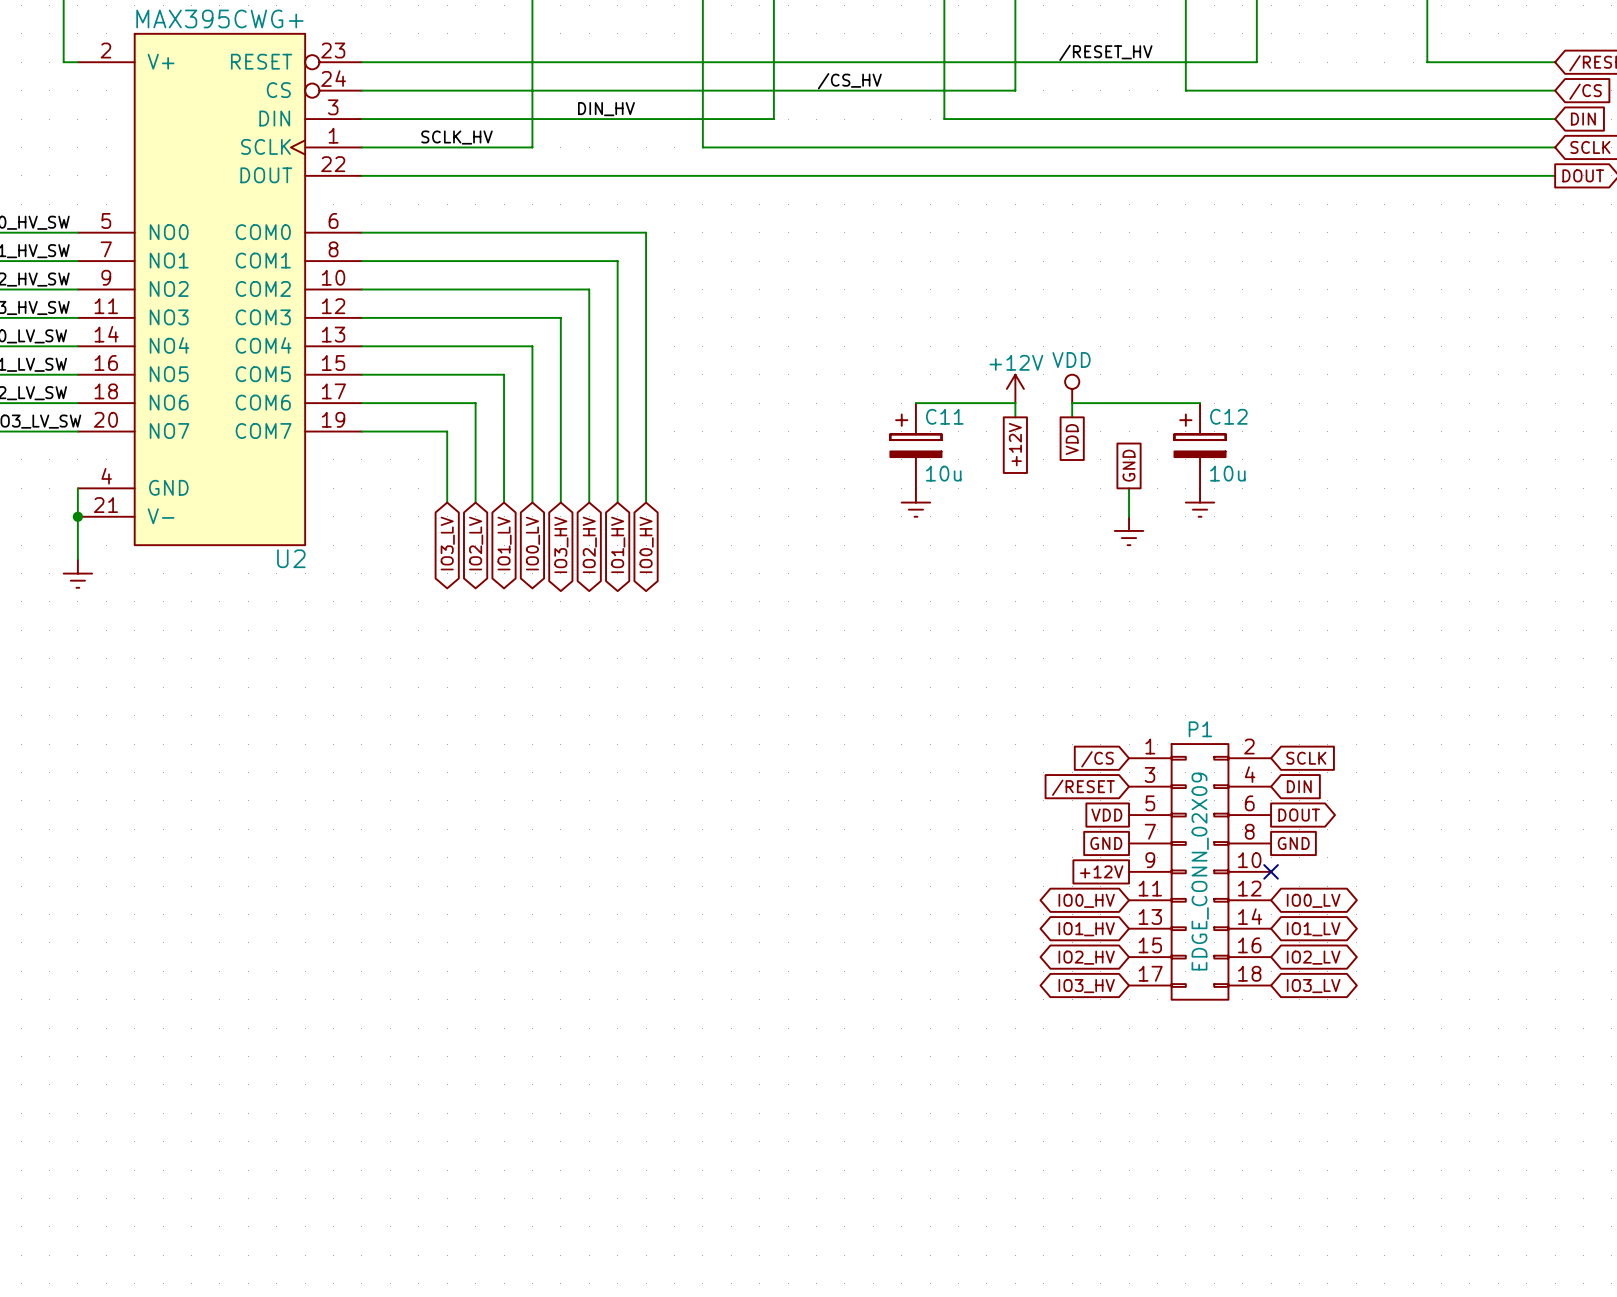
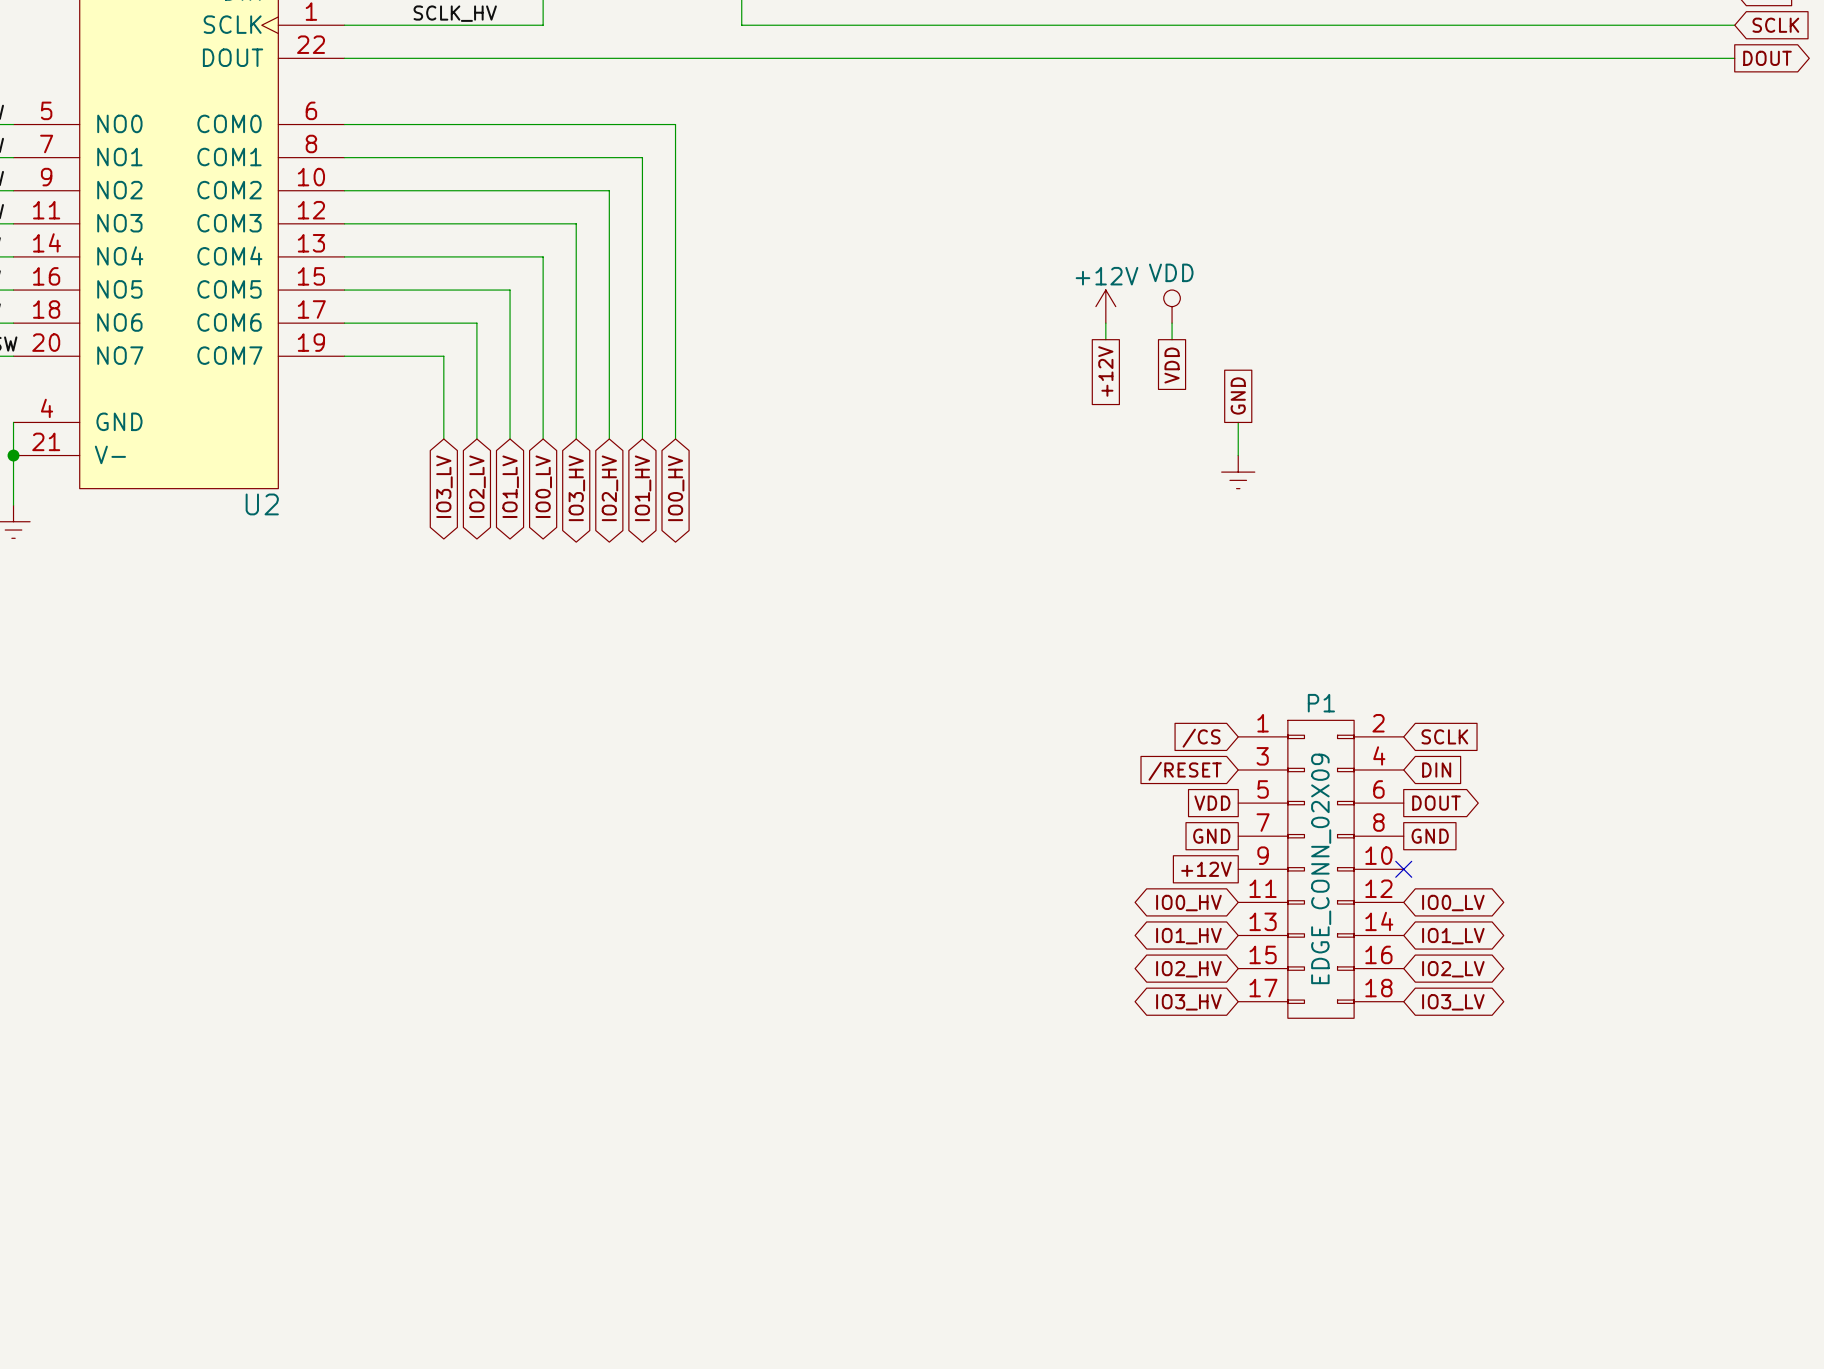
wire: (915, 403) (1015, 403) -> none
wire: (1072, 403) (1200, 403) -> none
C11: 10u (915, 445) -> none
C12: 10u (1200, 445) -> none
power symbol: (915, 502) -> none
power symbol: (1200, 502) -> none

